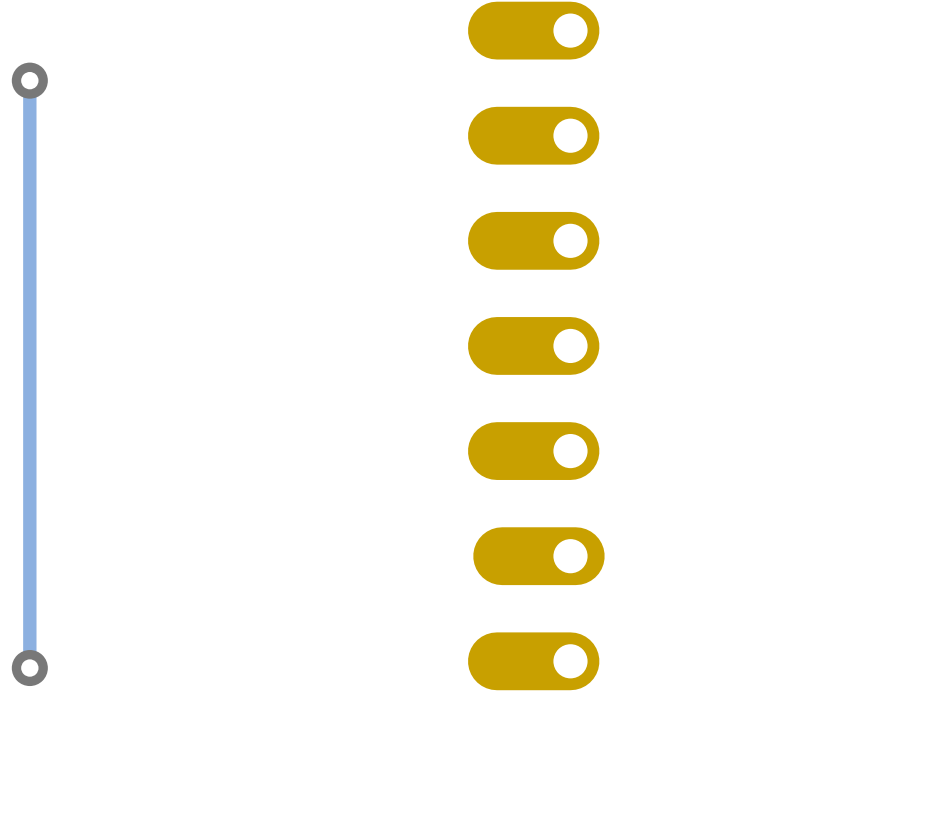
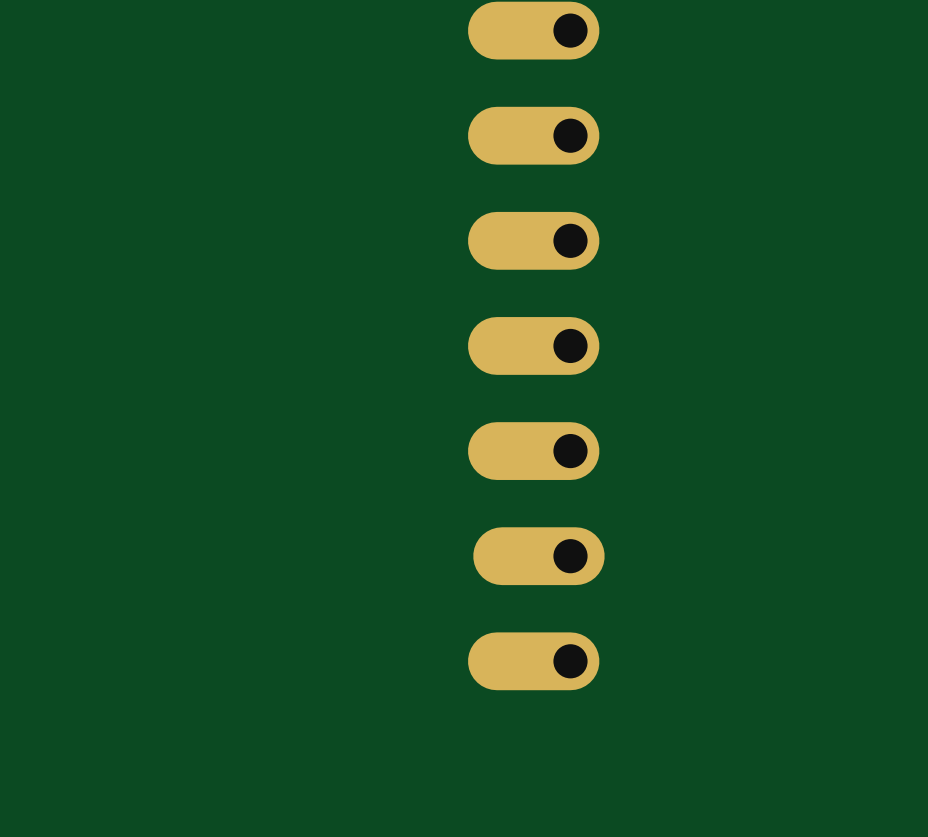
track: (29, 80) (29, 668) -> none
via: (29, 80) -> none
via: (29, 668) -> none

